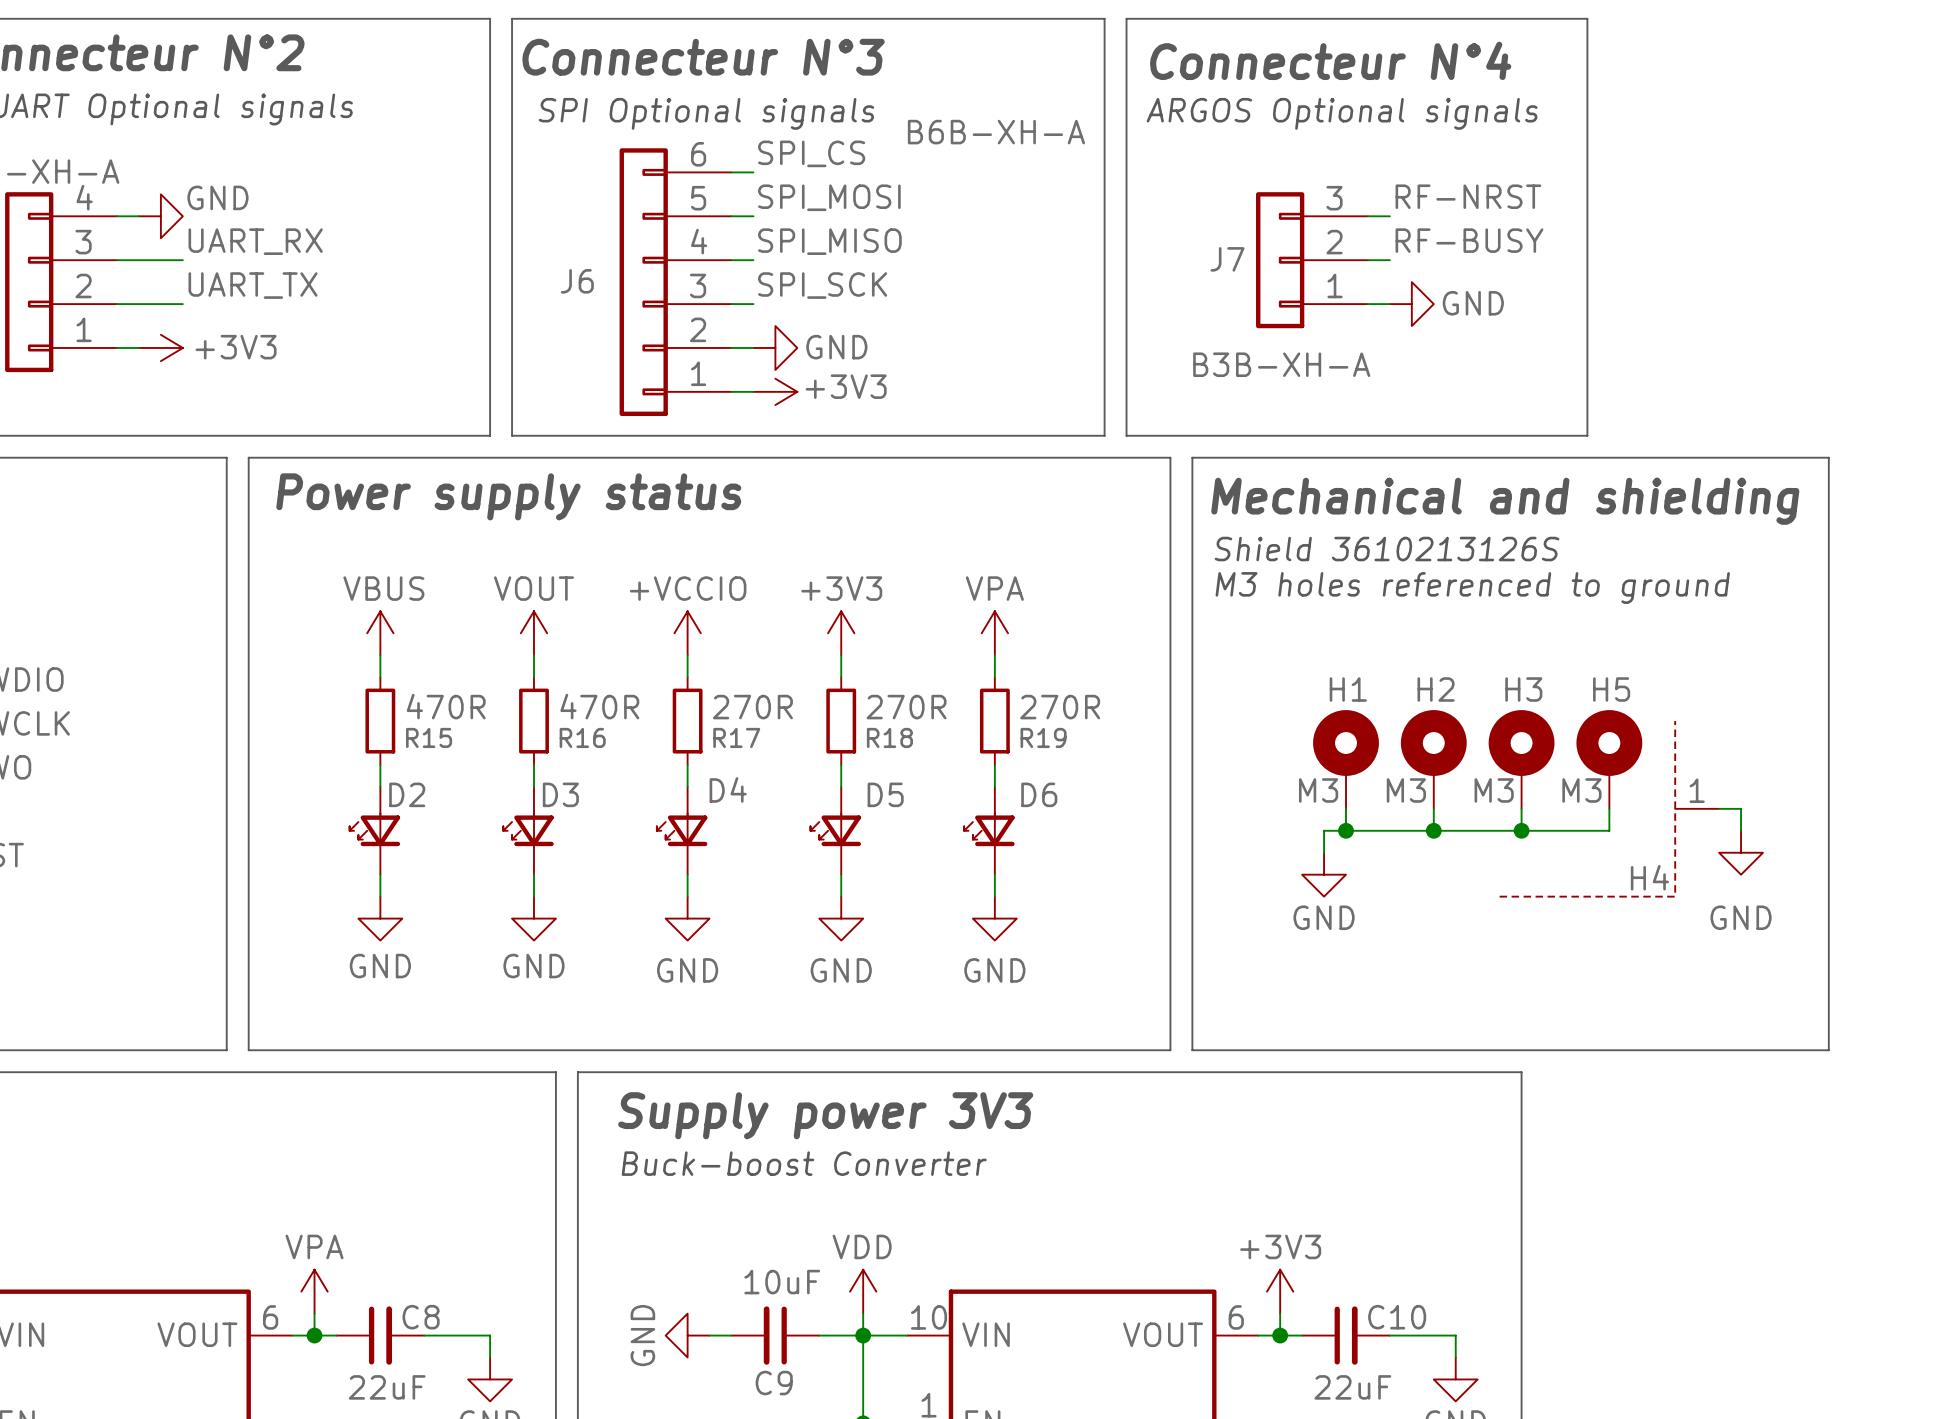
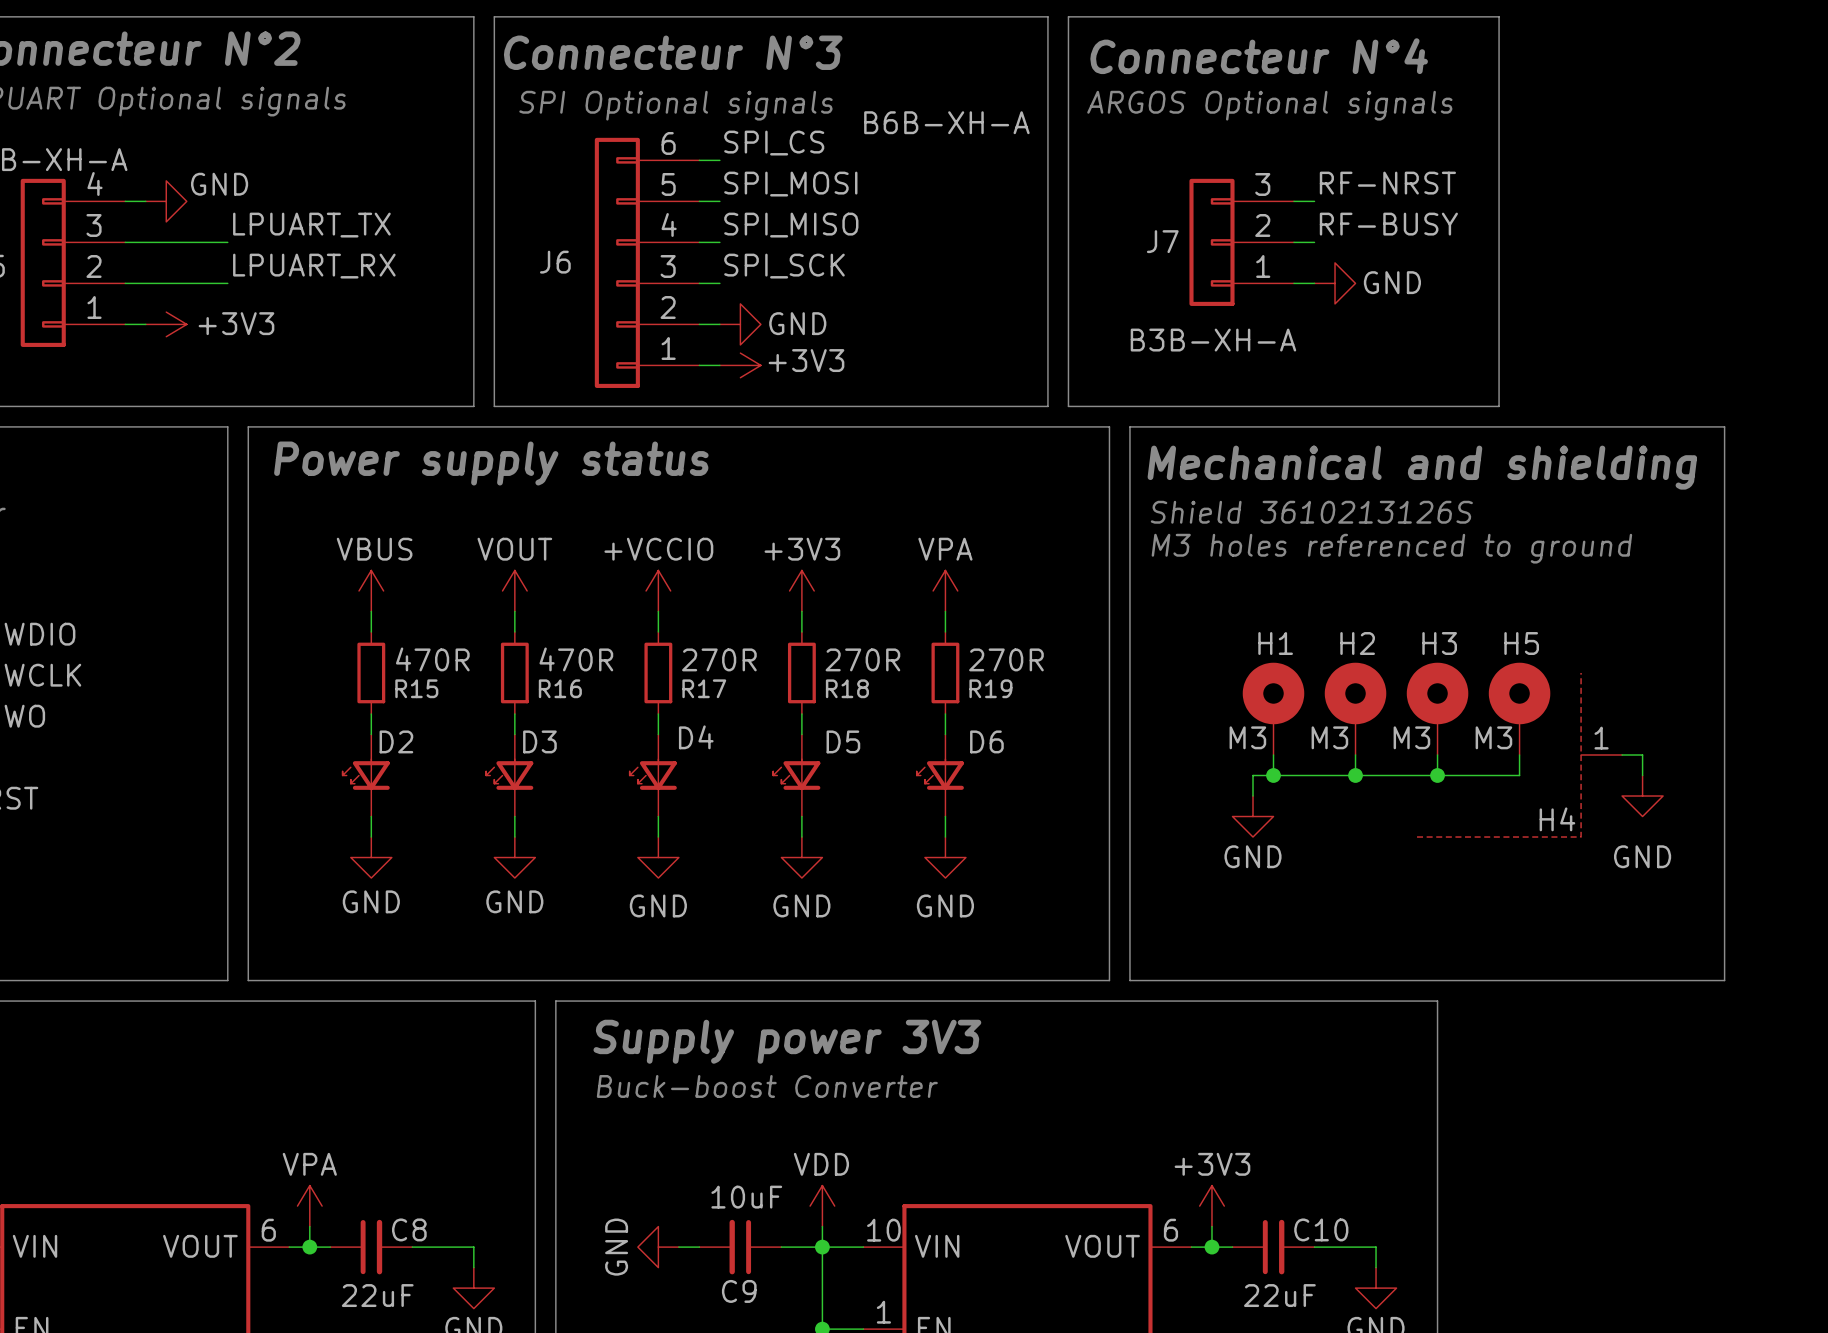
label: UART_RX (255, 241) -> none
label: none -> LPUART_TX (311, 225)
wire: none -> (186, 242) (227, 242)
label: UART_TX (253, 285) -> none
label: none -> LPUART_RX (314, 266)
wire: none -> (186, 283) (227, 283)

